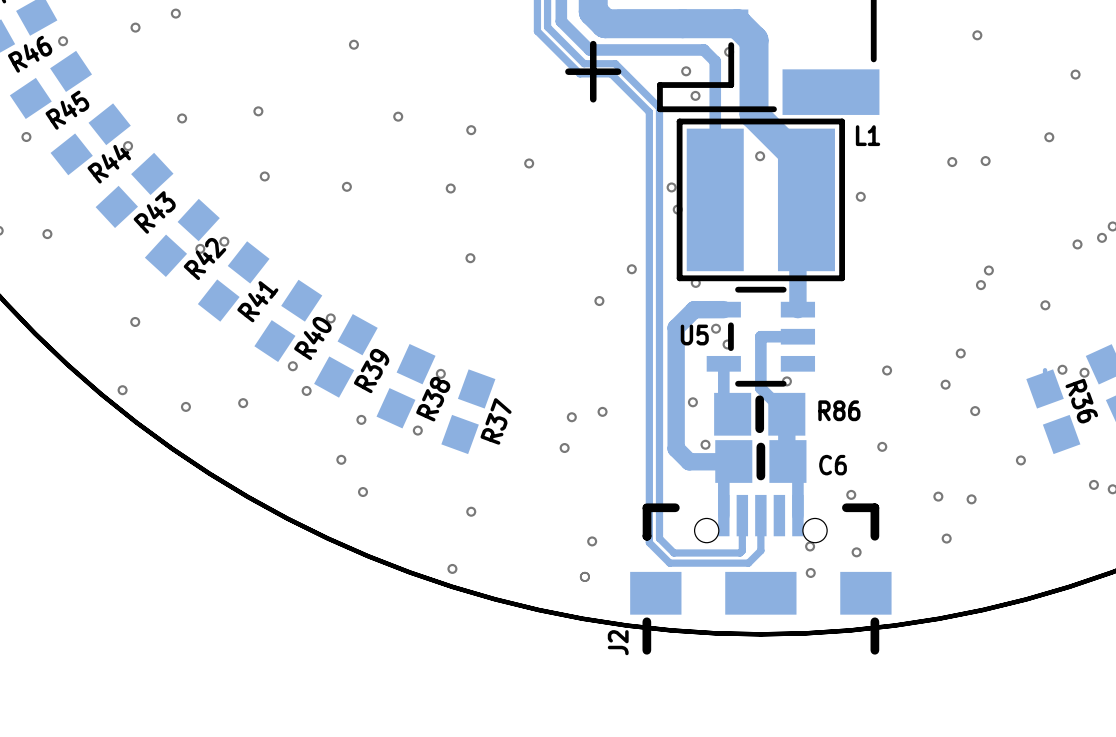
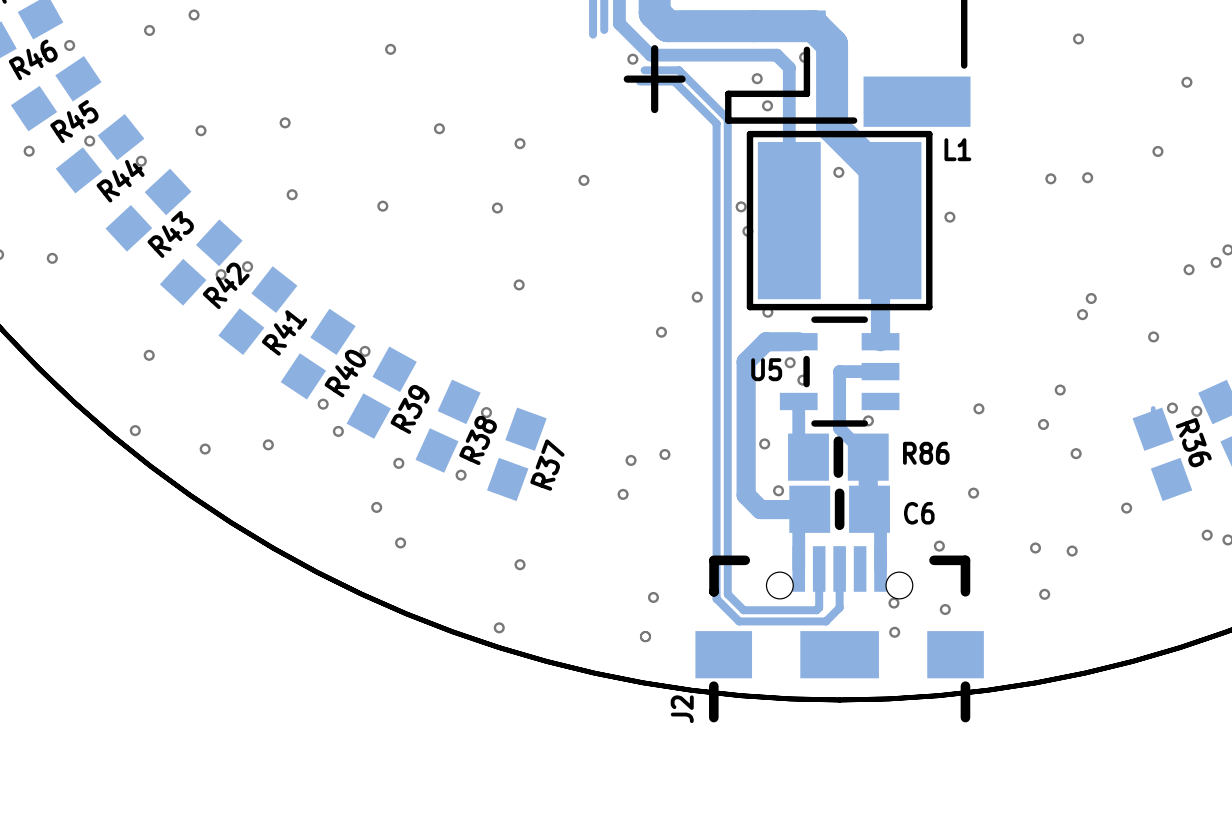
track: (547, 27) (584, 63) -> none
track: (537, 31) (579, 73) -> none
via: none -> (632, 59)
via: none -> (89, 141)

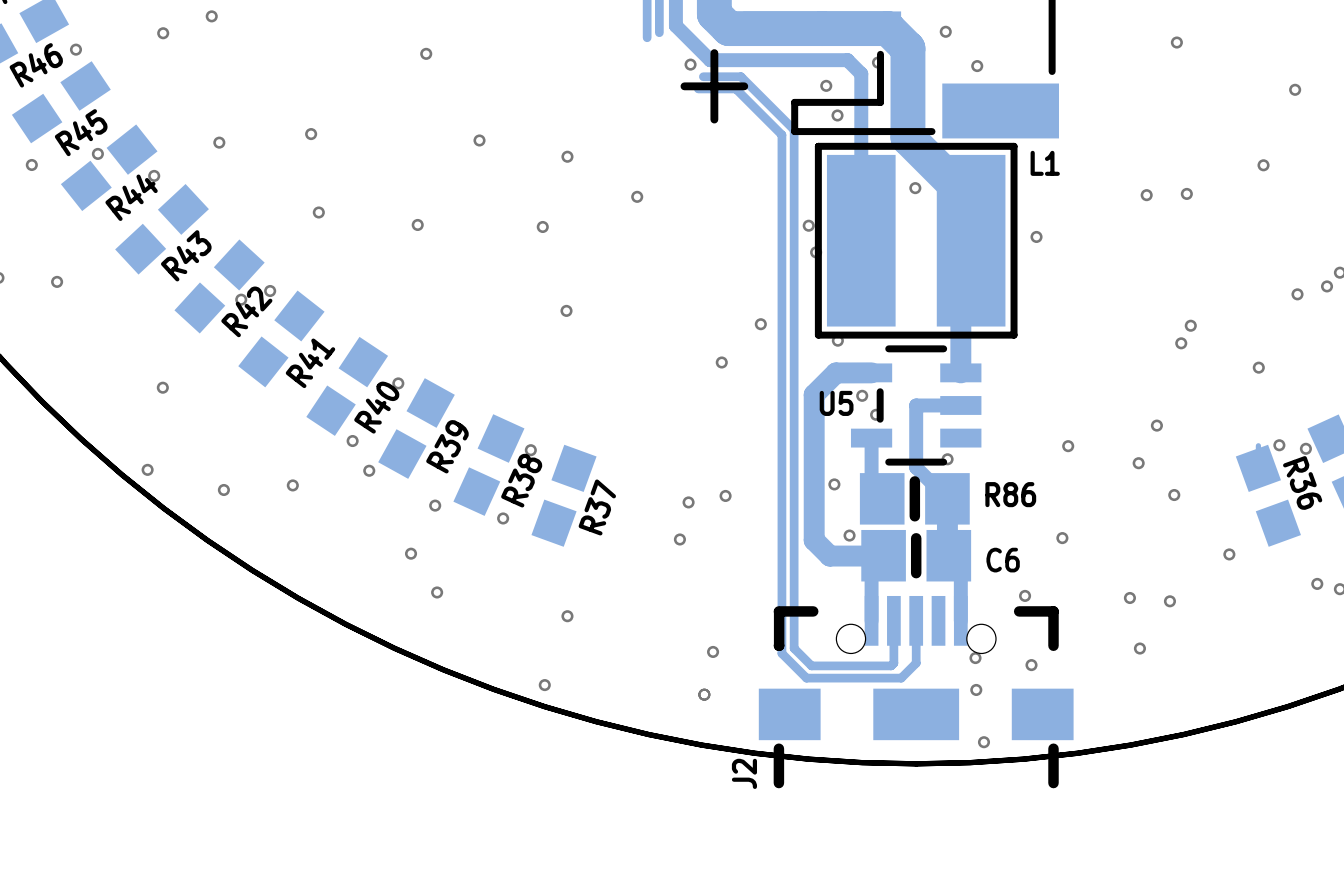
via: none -> (945, 31)
via: none -> (977, 66)
via: none -> (983, 742)

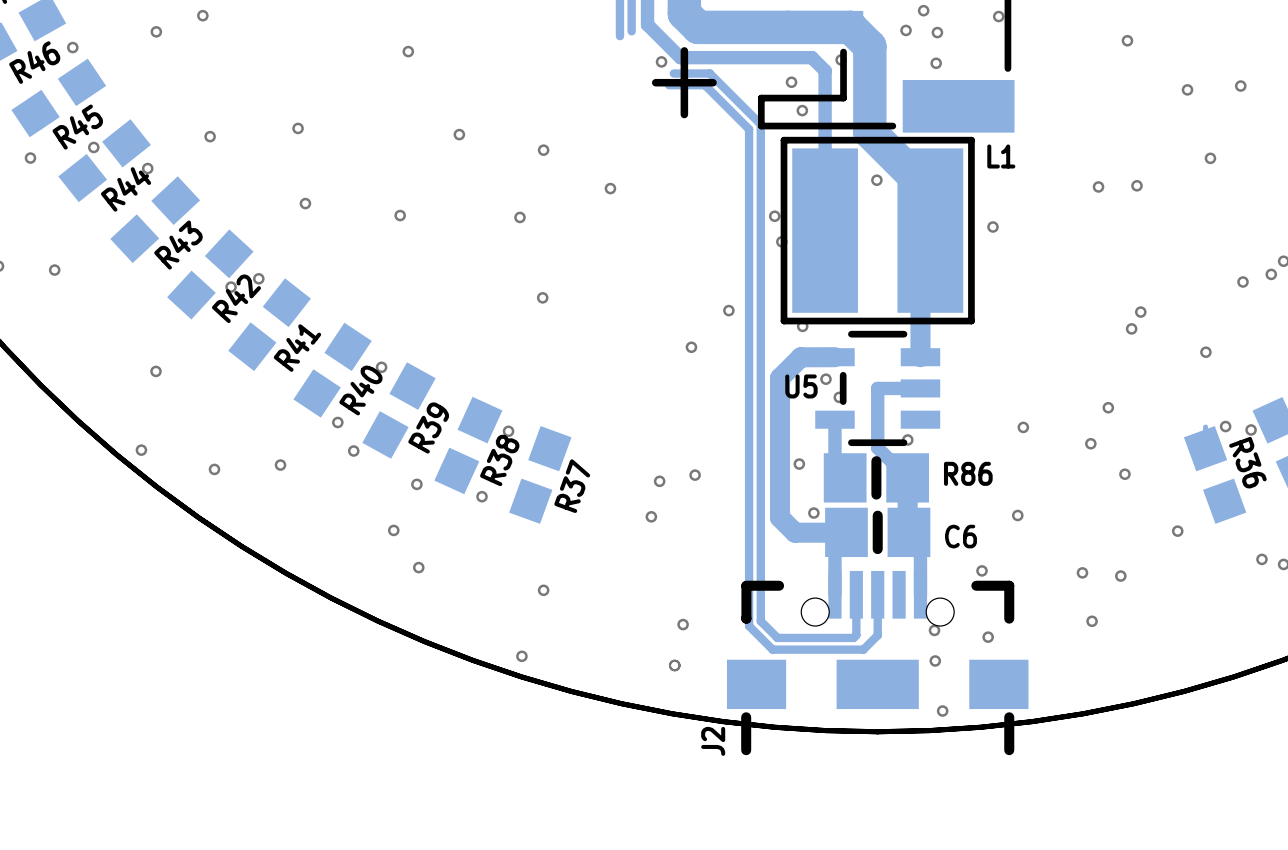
via: none -> (923, 10)
via: none -> (998, 16)
via: none -> (937, 32)
via: none -> (1187, 89)

